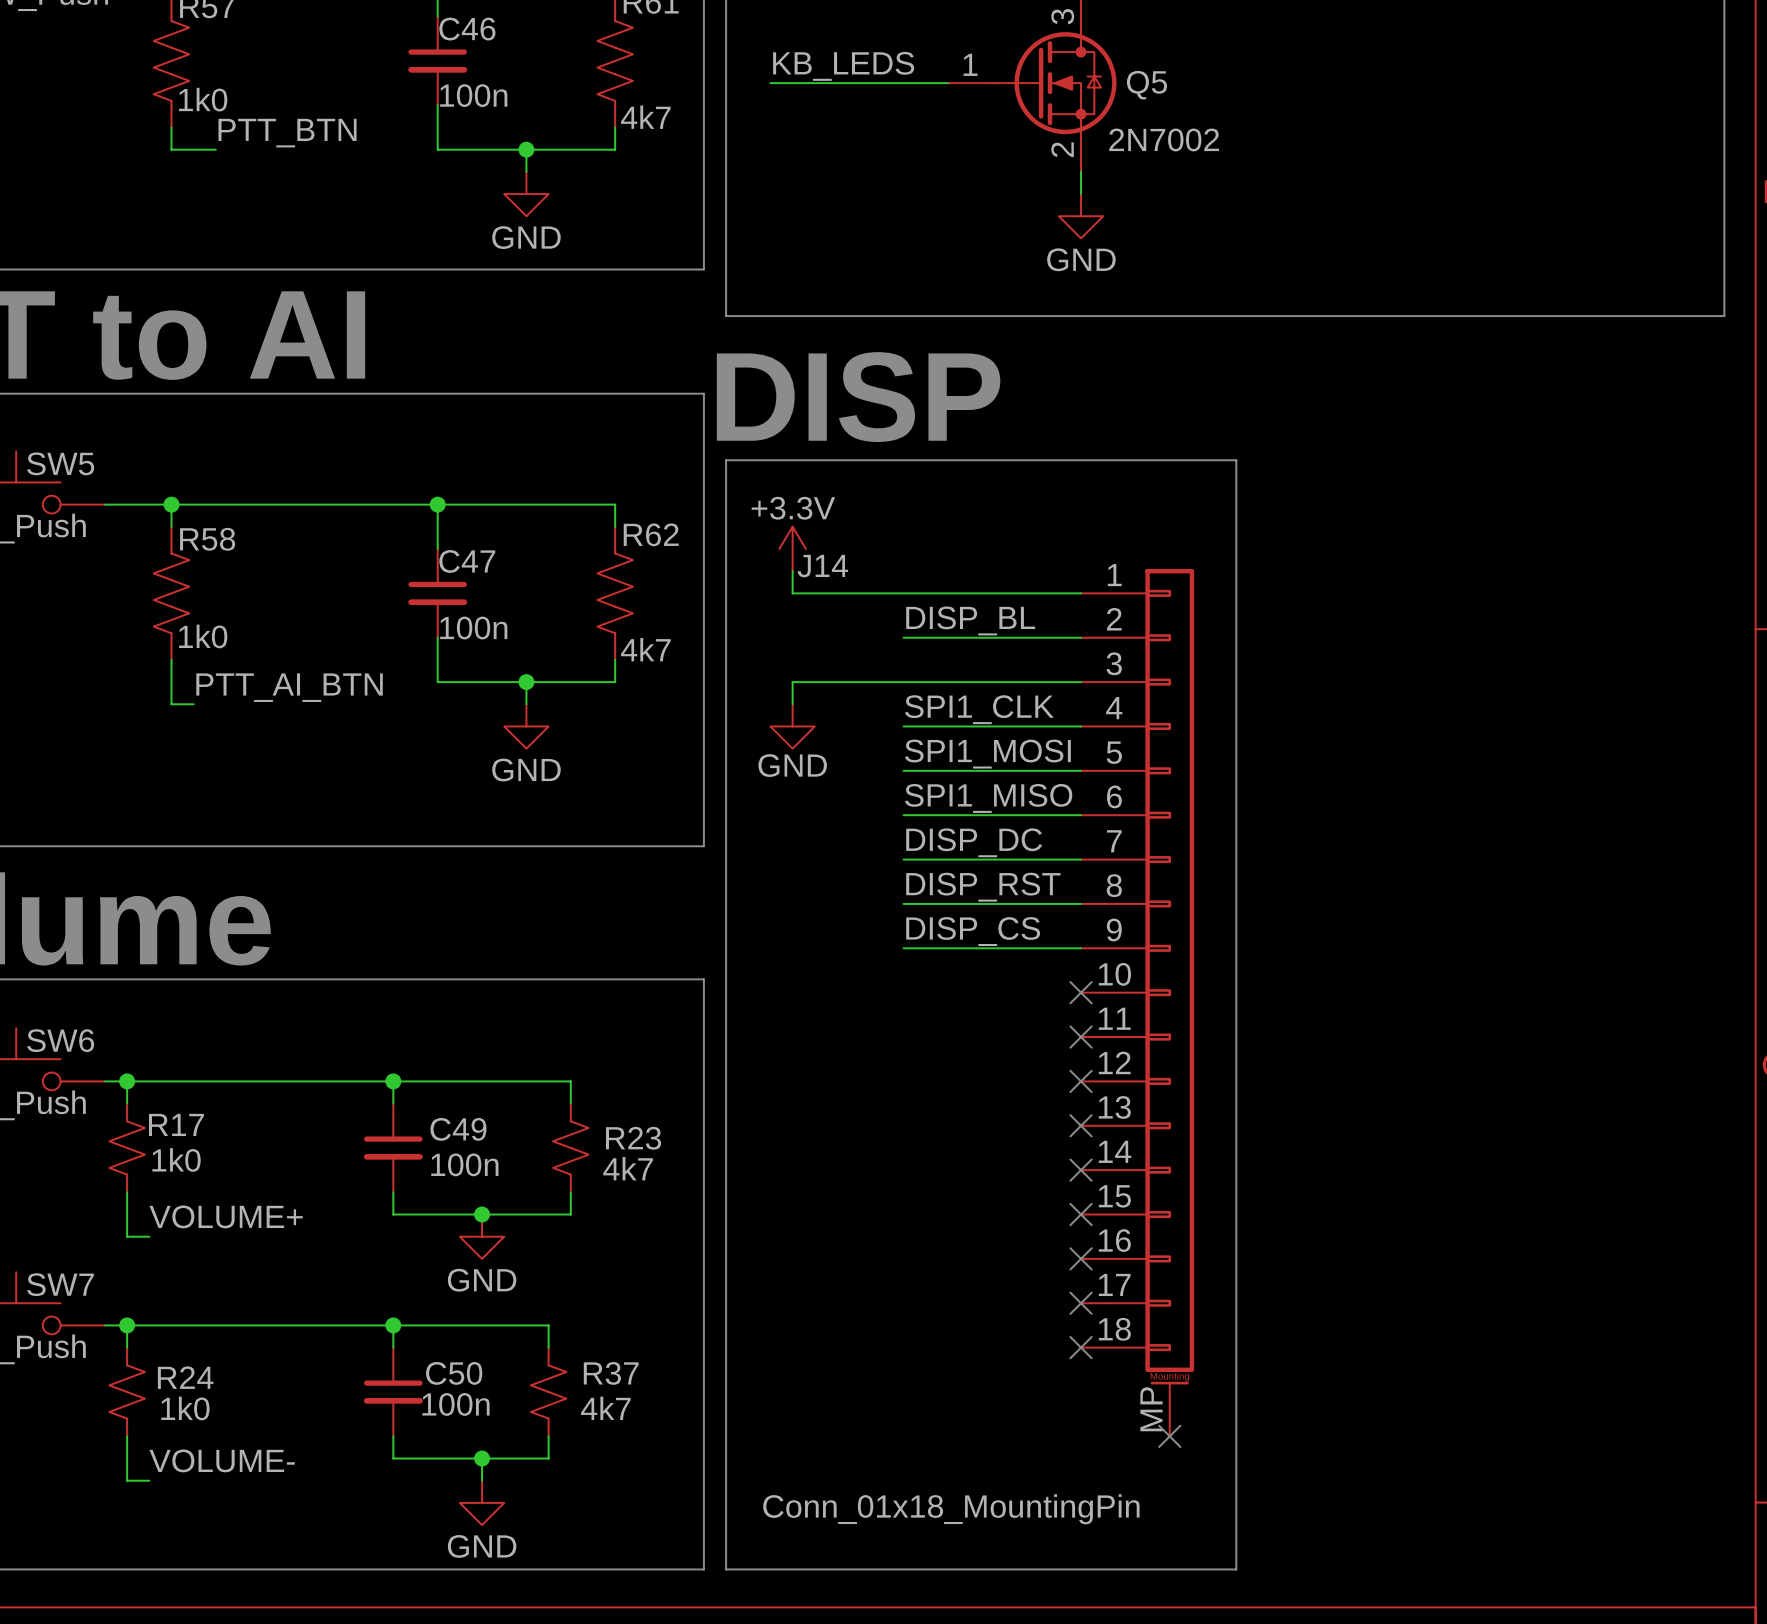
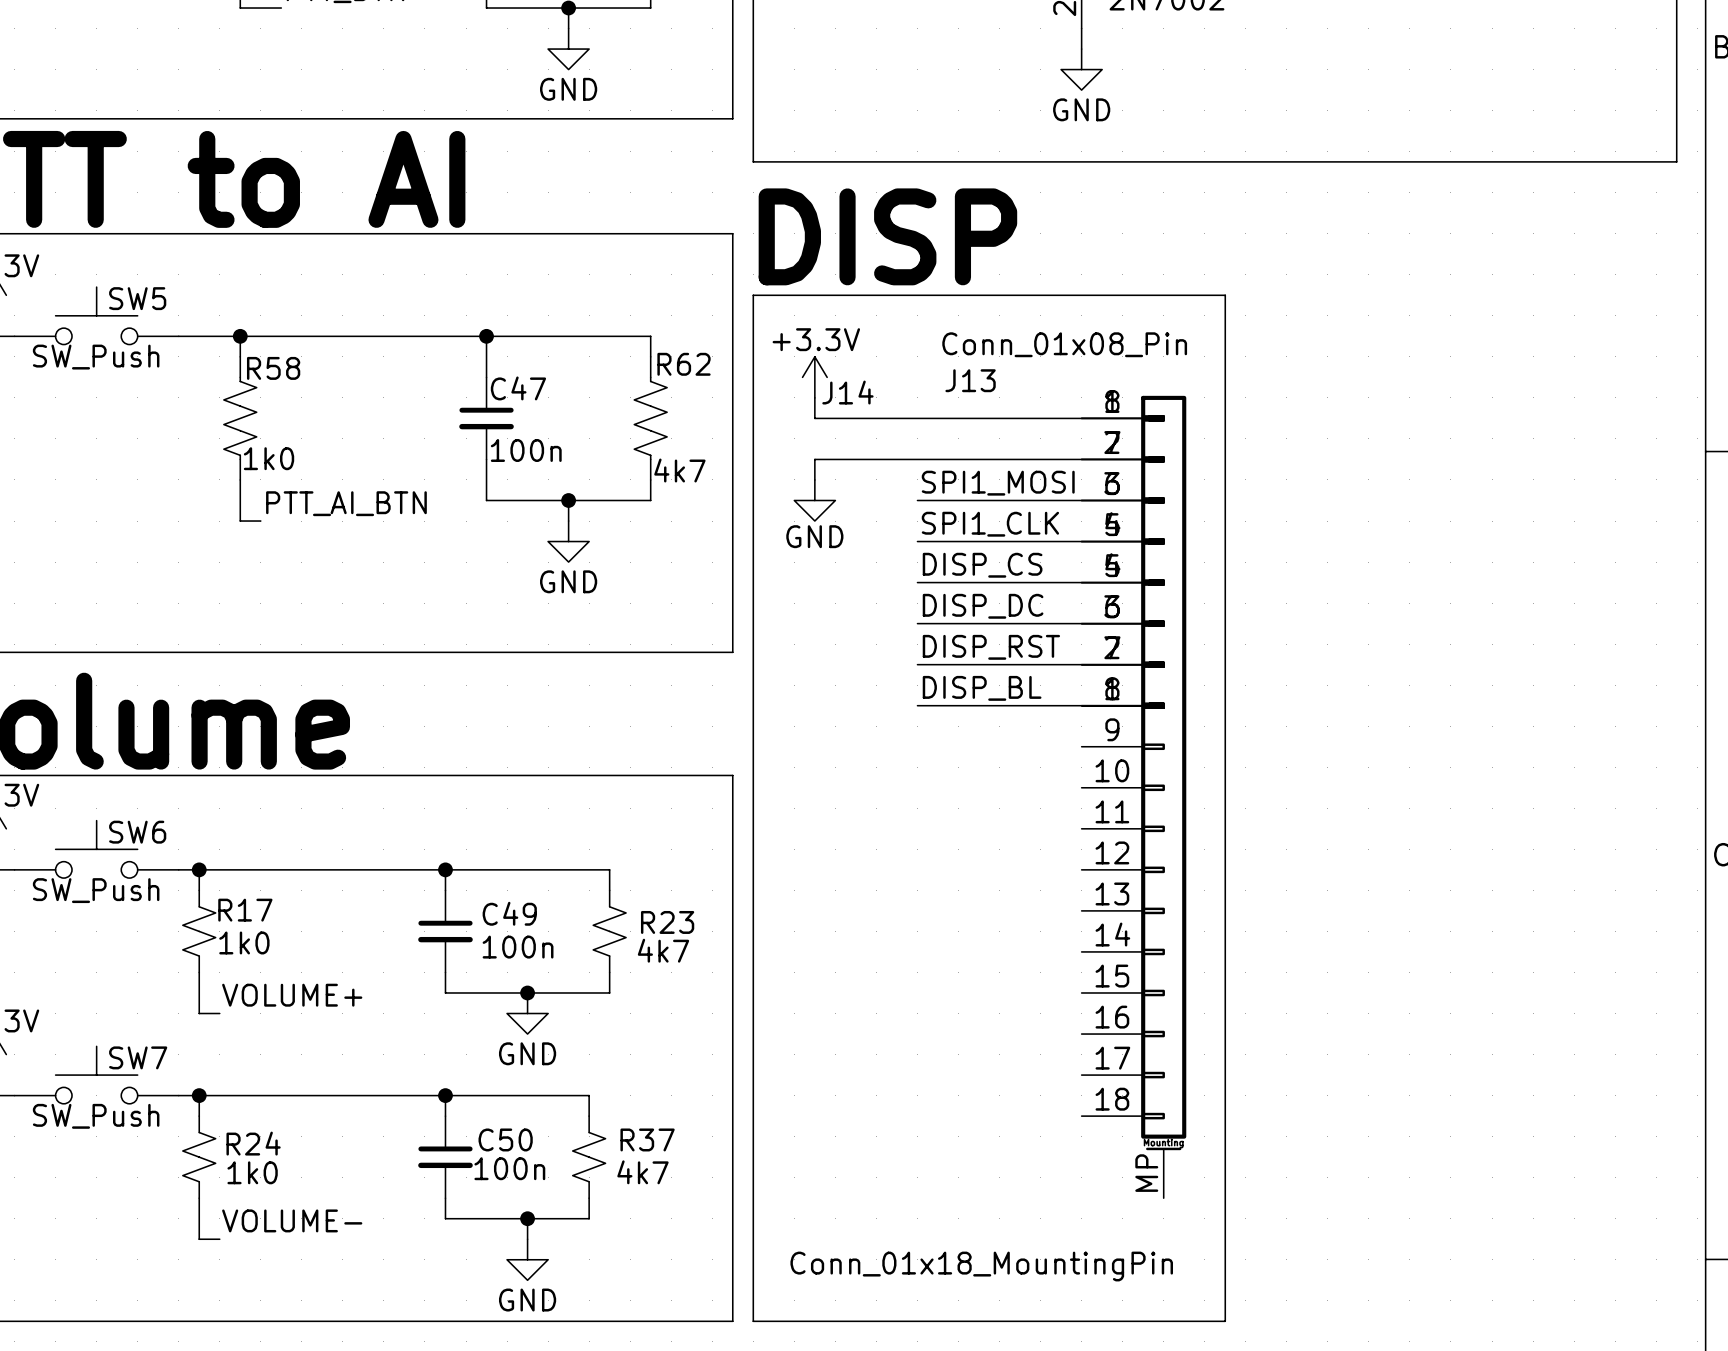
label: DISP_BL (970, 620) -> none
label: none -> SPI1_MOSI (998, 483)
wire: (903, 682) (792, 682) (792, 704) -> (917, 459) (814, 459) (814, 479)
power symbol position: GND (792, 726) -> GND (814, 500)
J13: none -> Conn_01x08_Pin (1123, 562)
label: SPI1_MOSI (987, 754) -> DISP_CS (982, 565)
label: SPI1_MISO (988, 798) -> DISP_DC (983, 606)
label: DISP_DC (974, 842) -> DISP_RST (991, 647)
label: DISP_RST (983, 887) -> DISP_BL (982, 688)
label: DISP_CS (973, 931) -> none
wire: (903, 948) (1081, 948) -> none
no-connect mark: (1081, 992) -> none
no-connect mark: (1081, 1037) -> none
no-connect mark: (1081, 1081) -> none
no-connect mark: (1081, 1125) -> none
no-connect mark: (1081, 1170) -> none
no-connect mark: (1081, 1214) -> none
no-connect mark: (1081, 1258) -> none
no-connect mark: (1081, 1303) -> none
no-connect mark: (1081, 1347) -> none
no-connect mark: (1169, 1436) -> none

